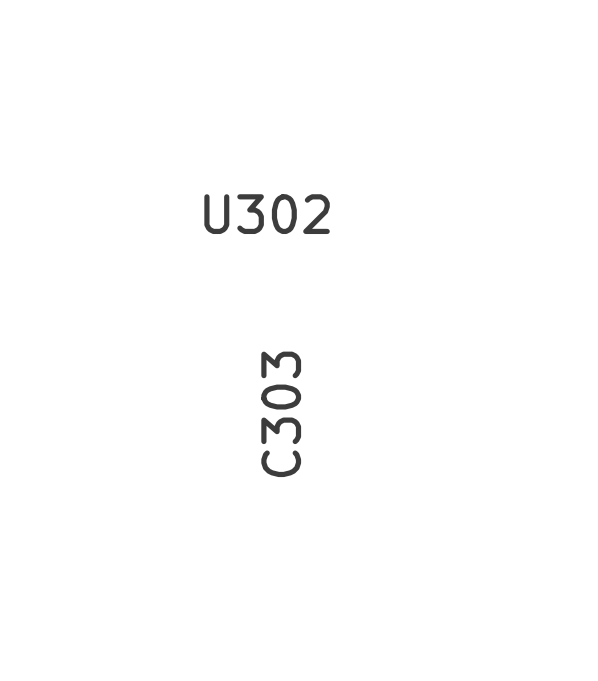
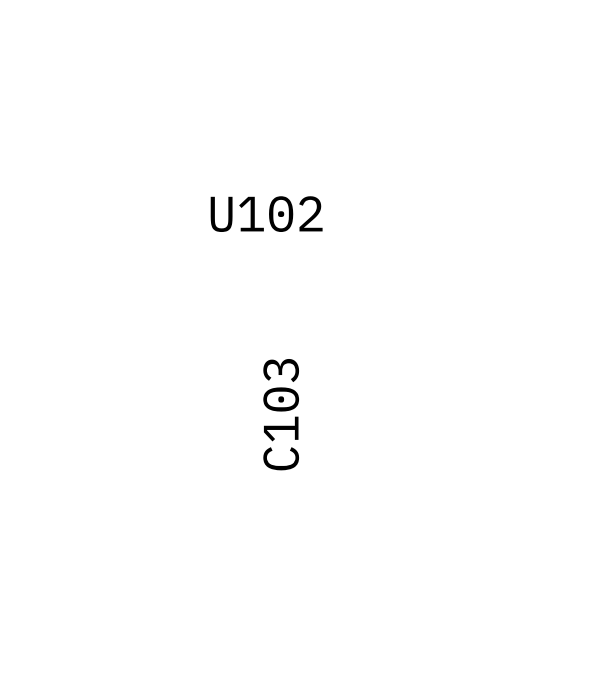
U302 name: U302 (267, 214) -> U102 (266, 214)
C303 name: C303 (281, 414) -> C103 (281, 414)

